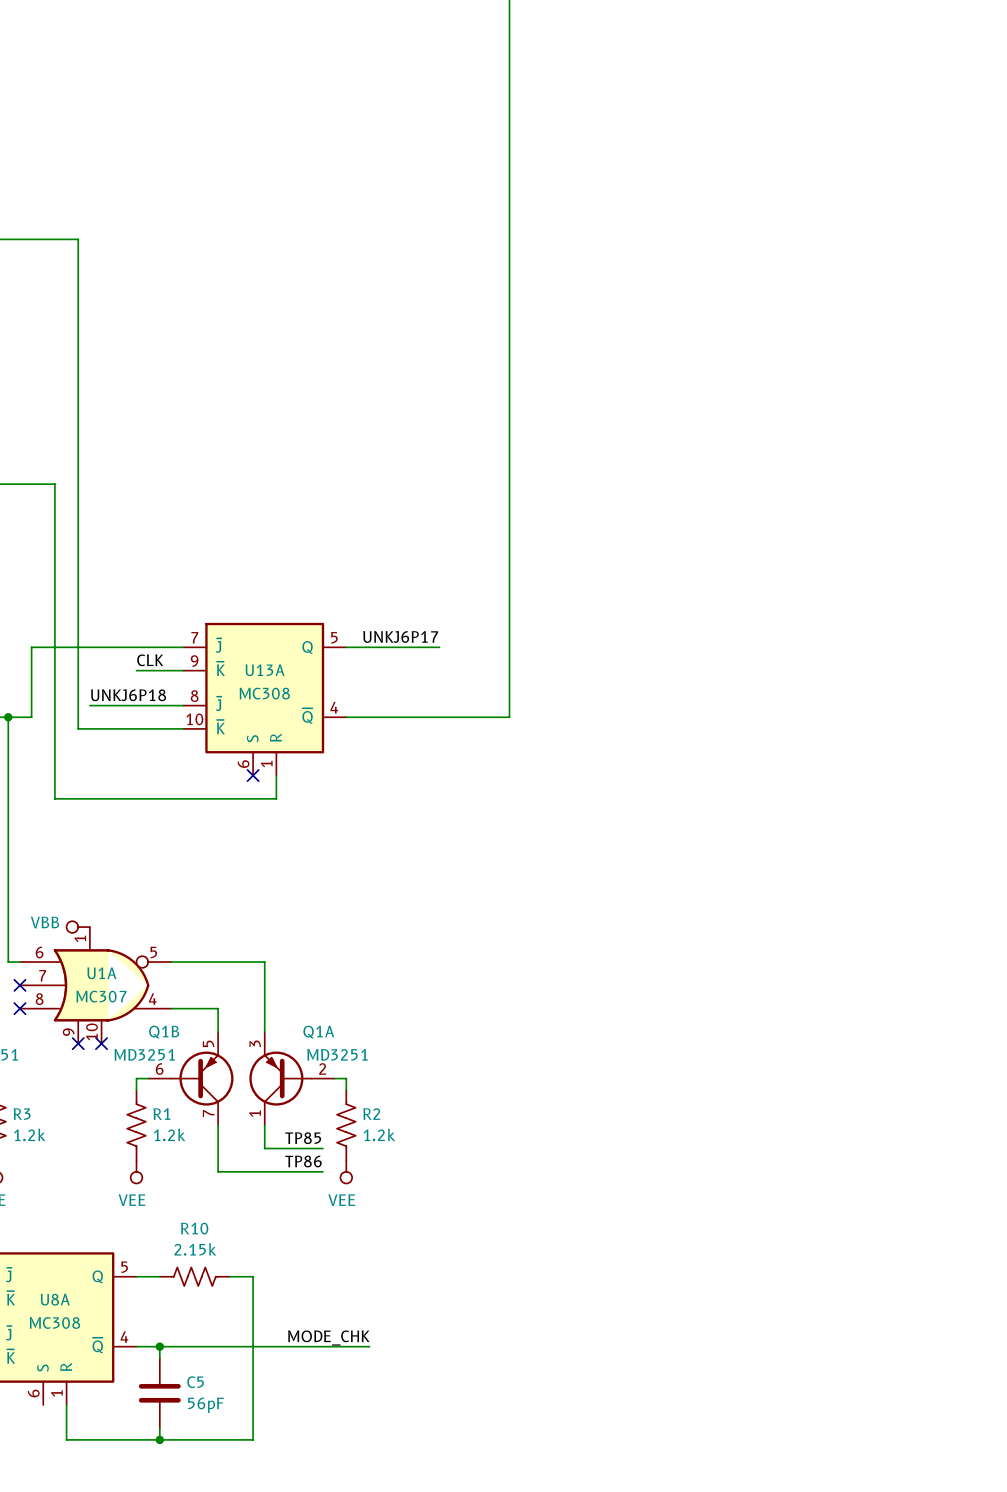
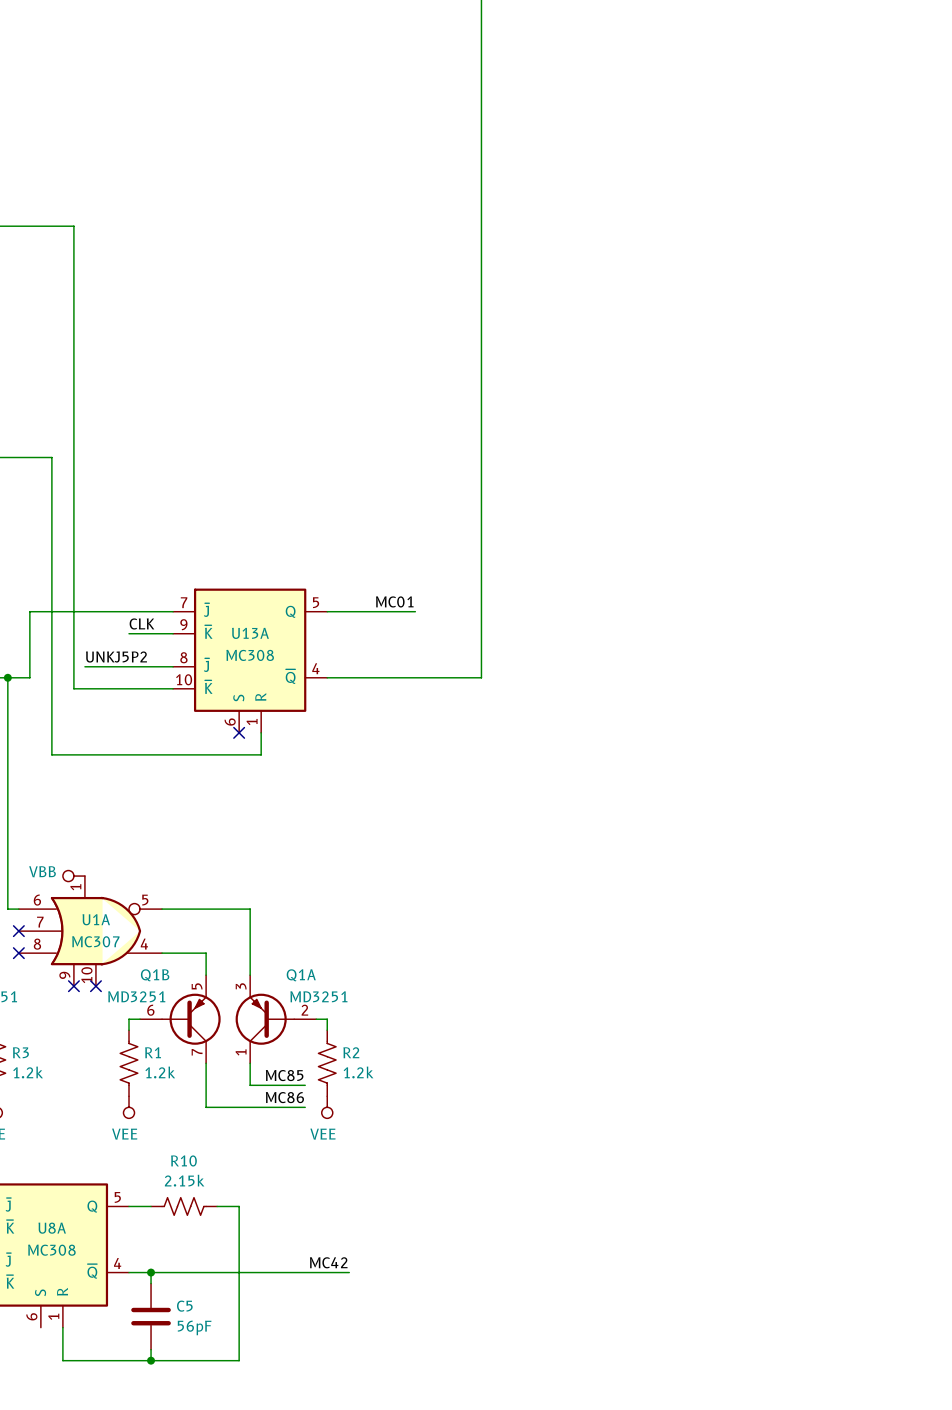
label: UNKJ6P17 (400, 636) -> MC01 (394, 601)
label: UNKJ6P18 (128, 695) -> UNKJ5P2 (116, 657)
label: TP85 (303, 1138) -> MC85 (284, 1075)
label: TP86 (303, 1161) -> MC86 (284, 1097)
label: MODE_CHK (328, 1338) -> MC42 (328, 1262)

